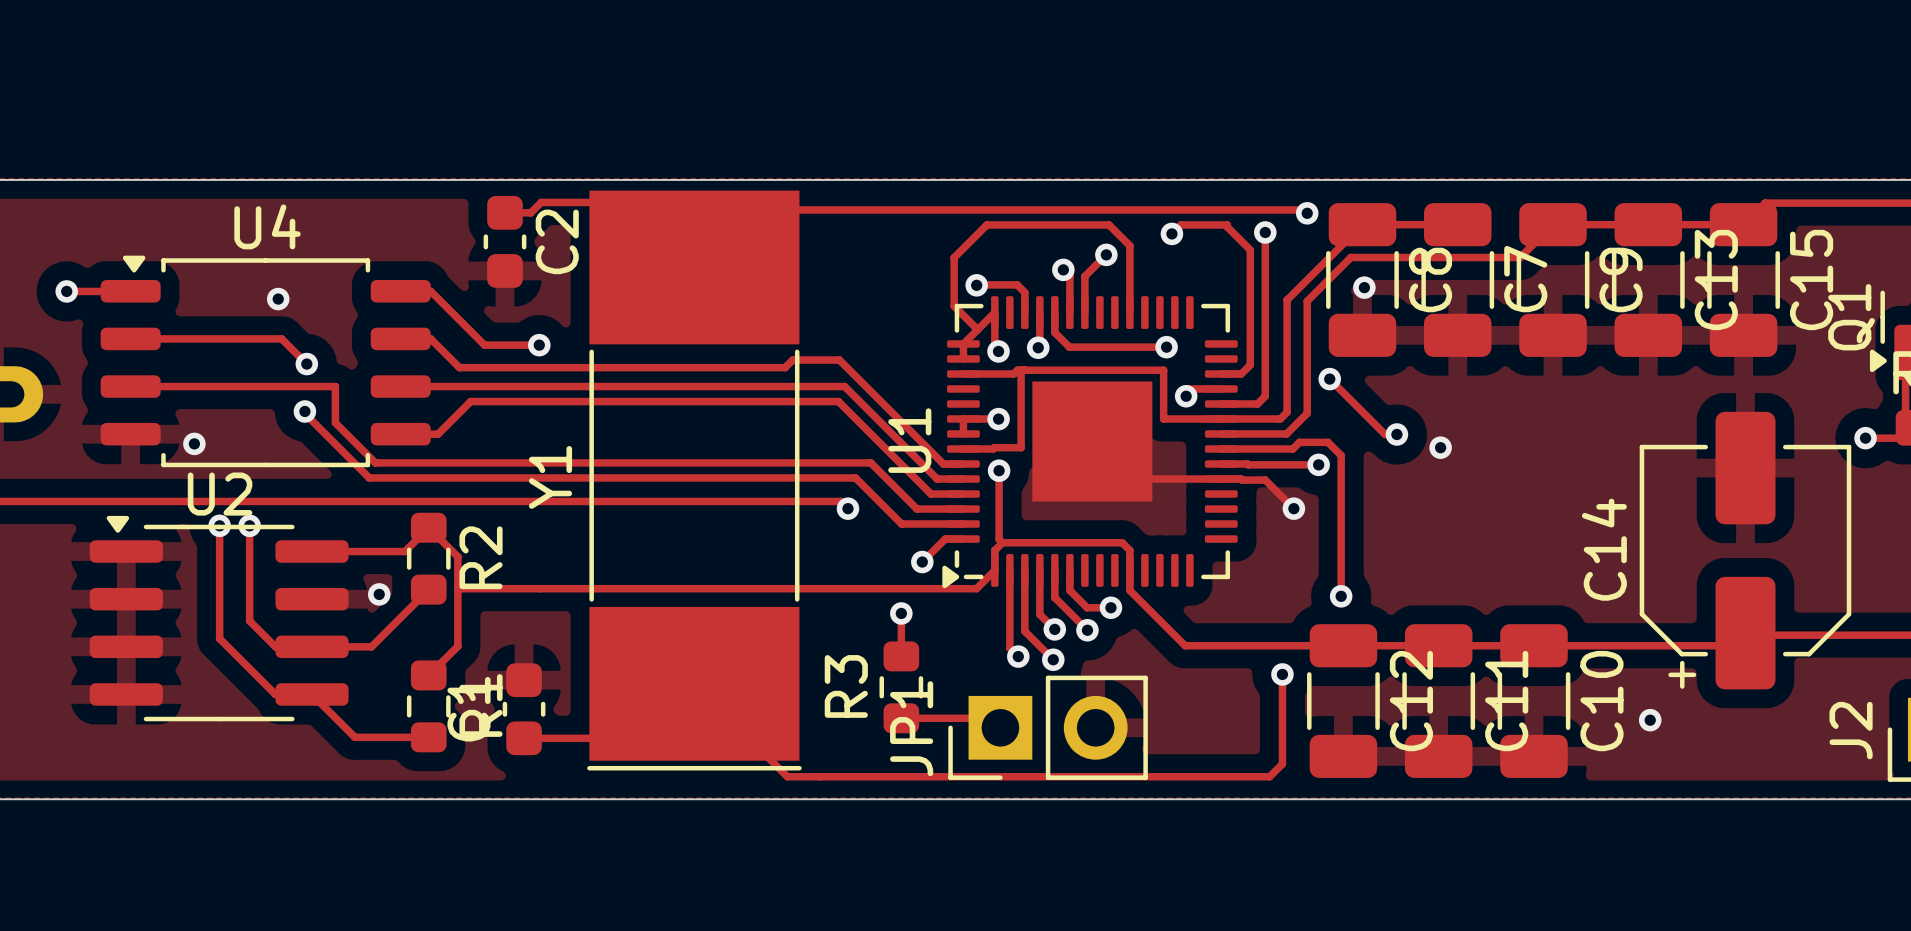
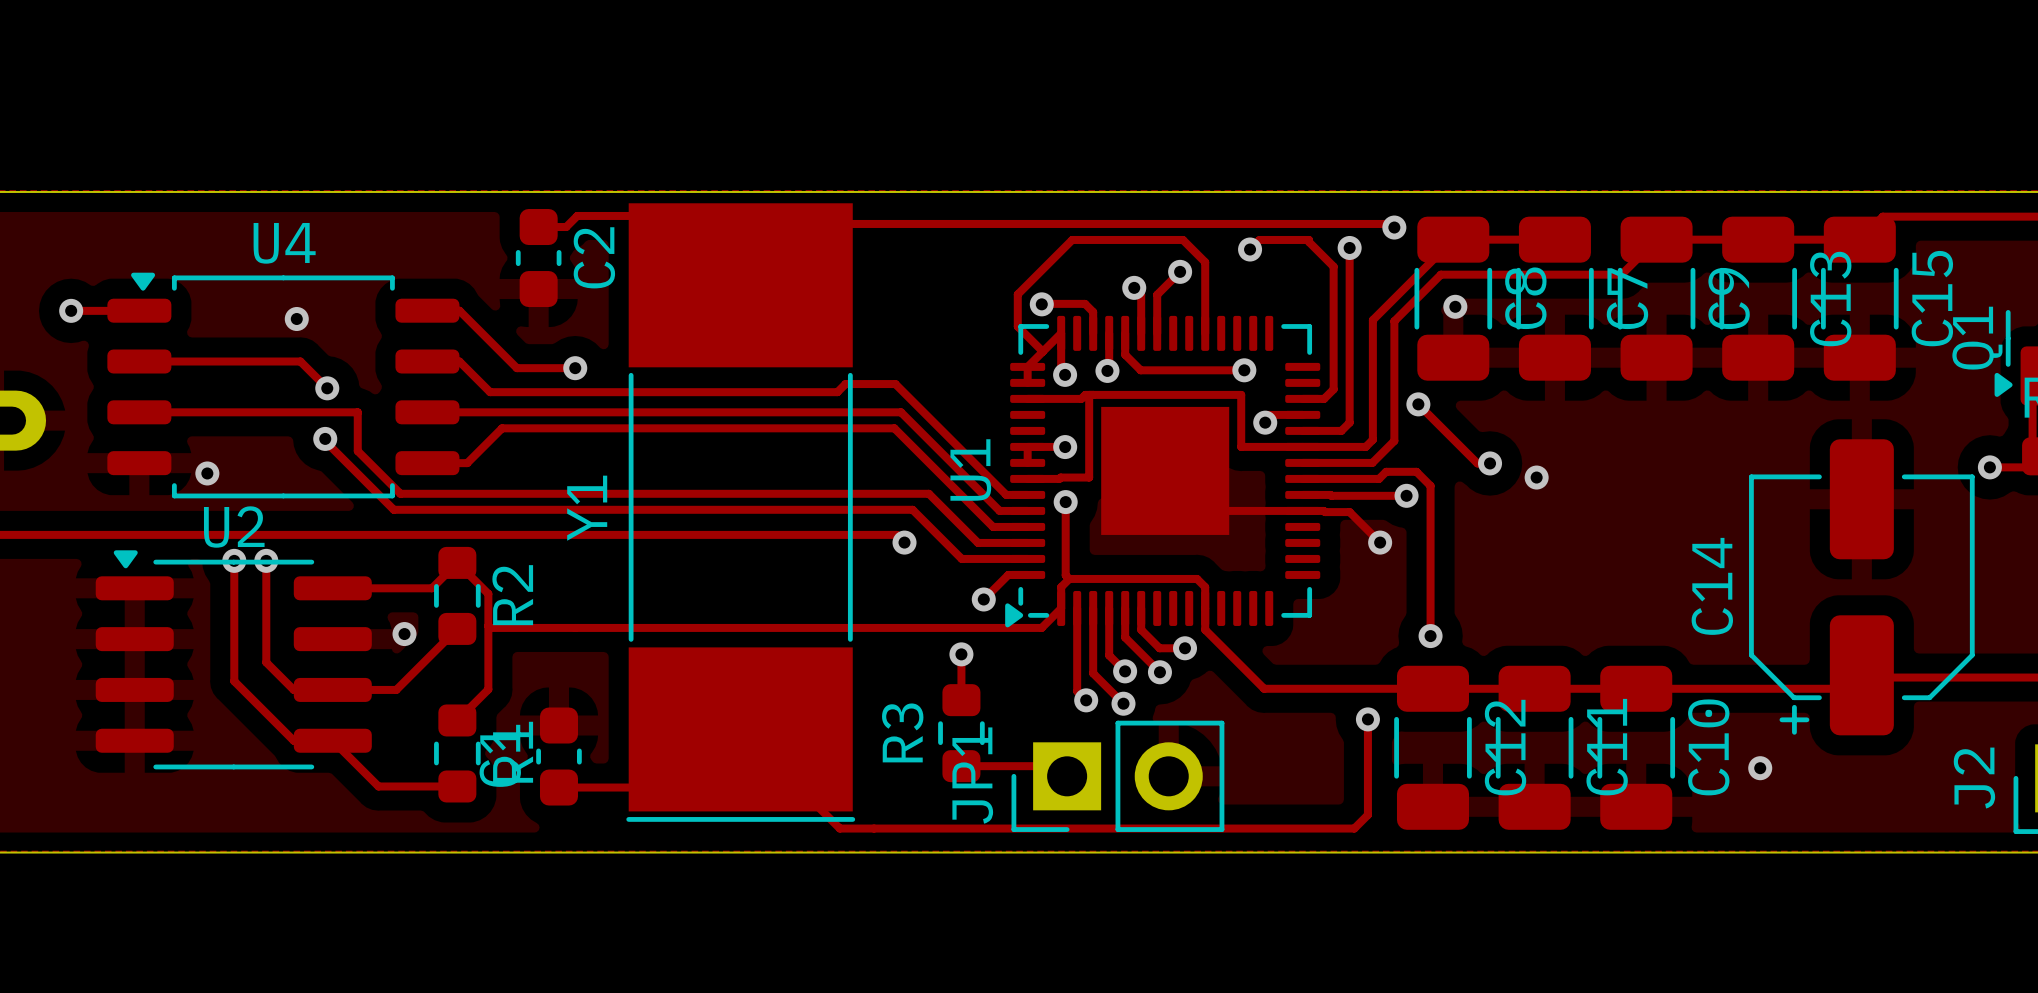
track: (1005, 224) (986, 224) (954, 257) (954, 276) -> (1072, 239) (1017, 294)

